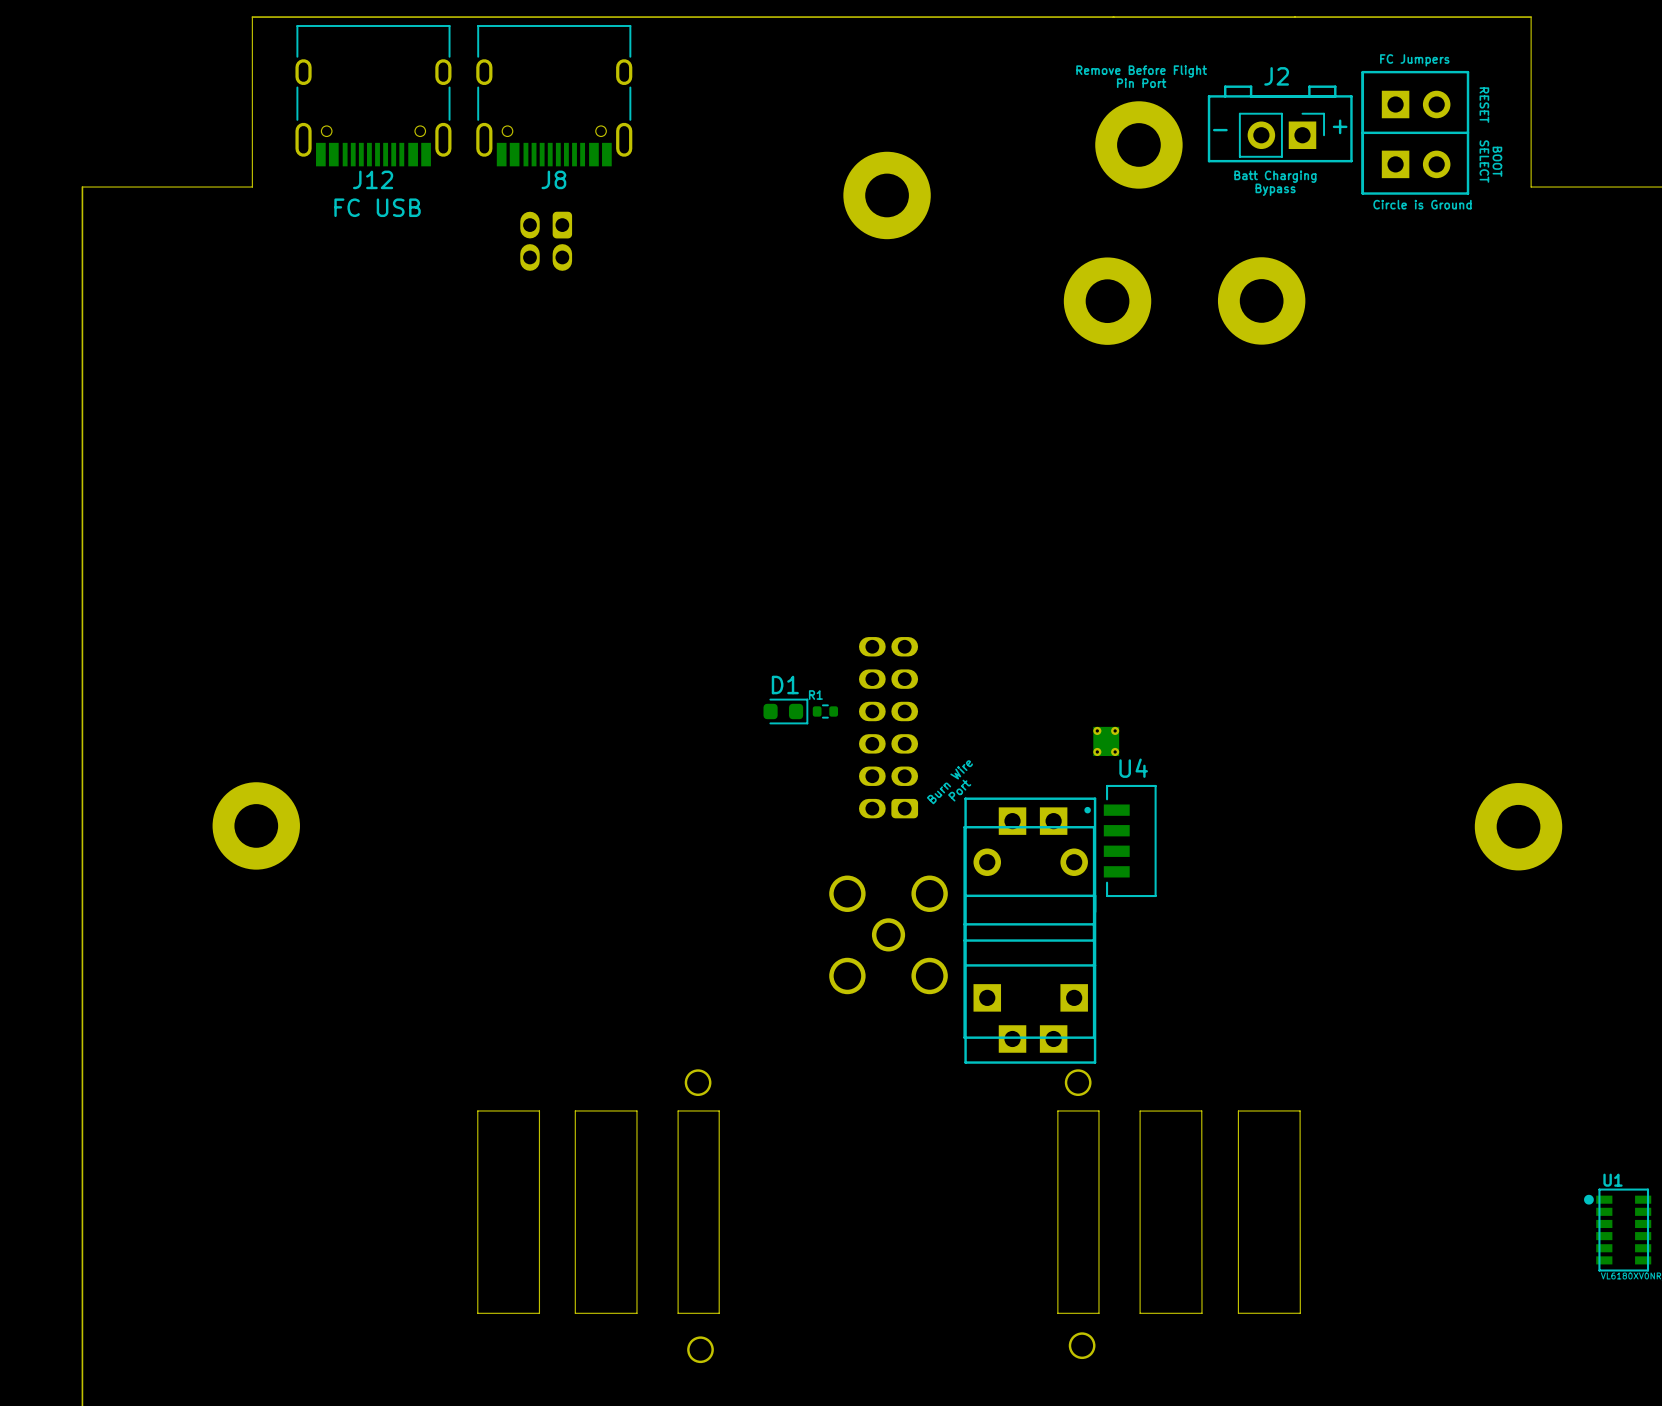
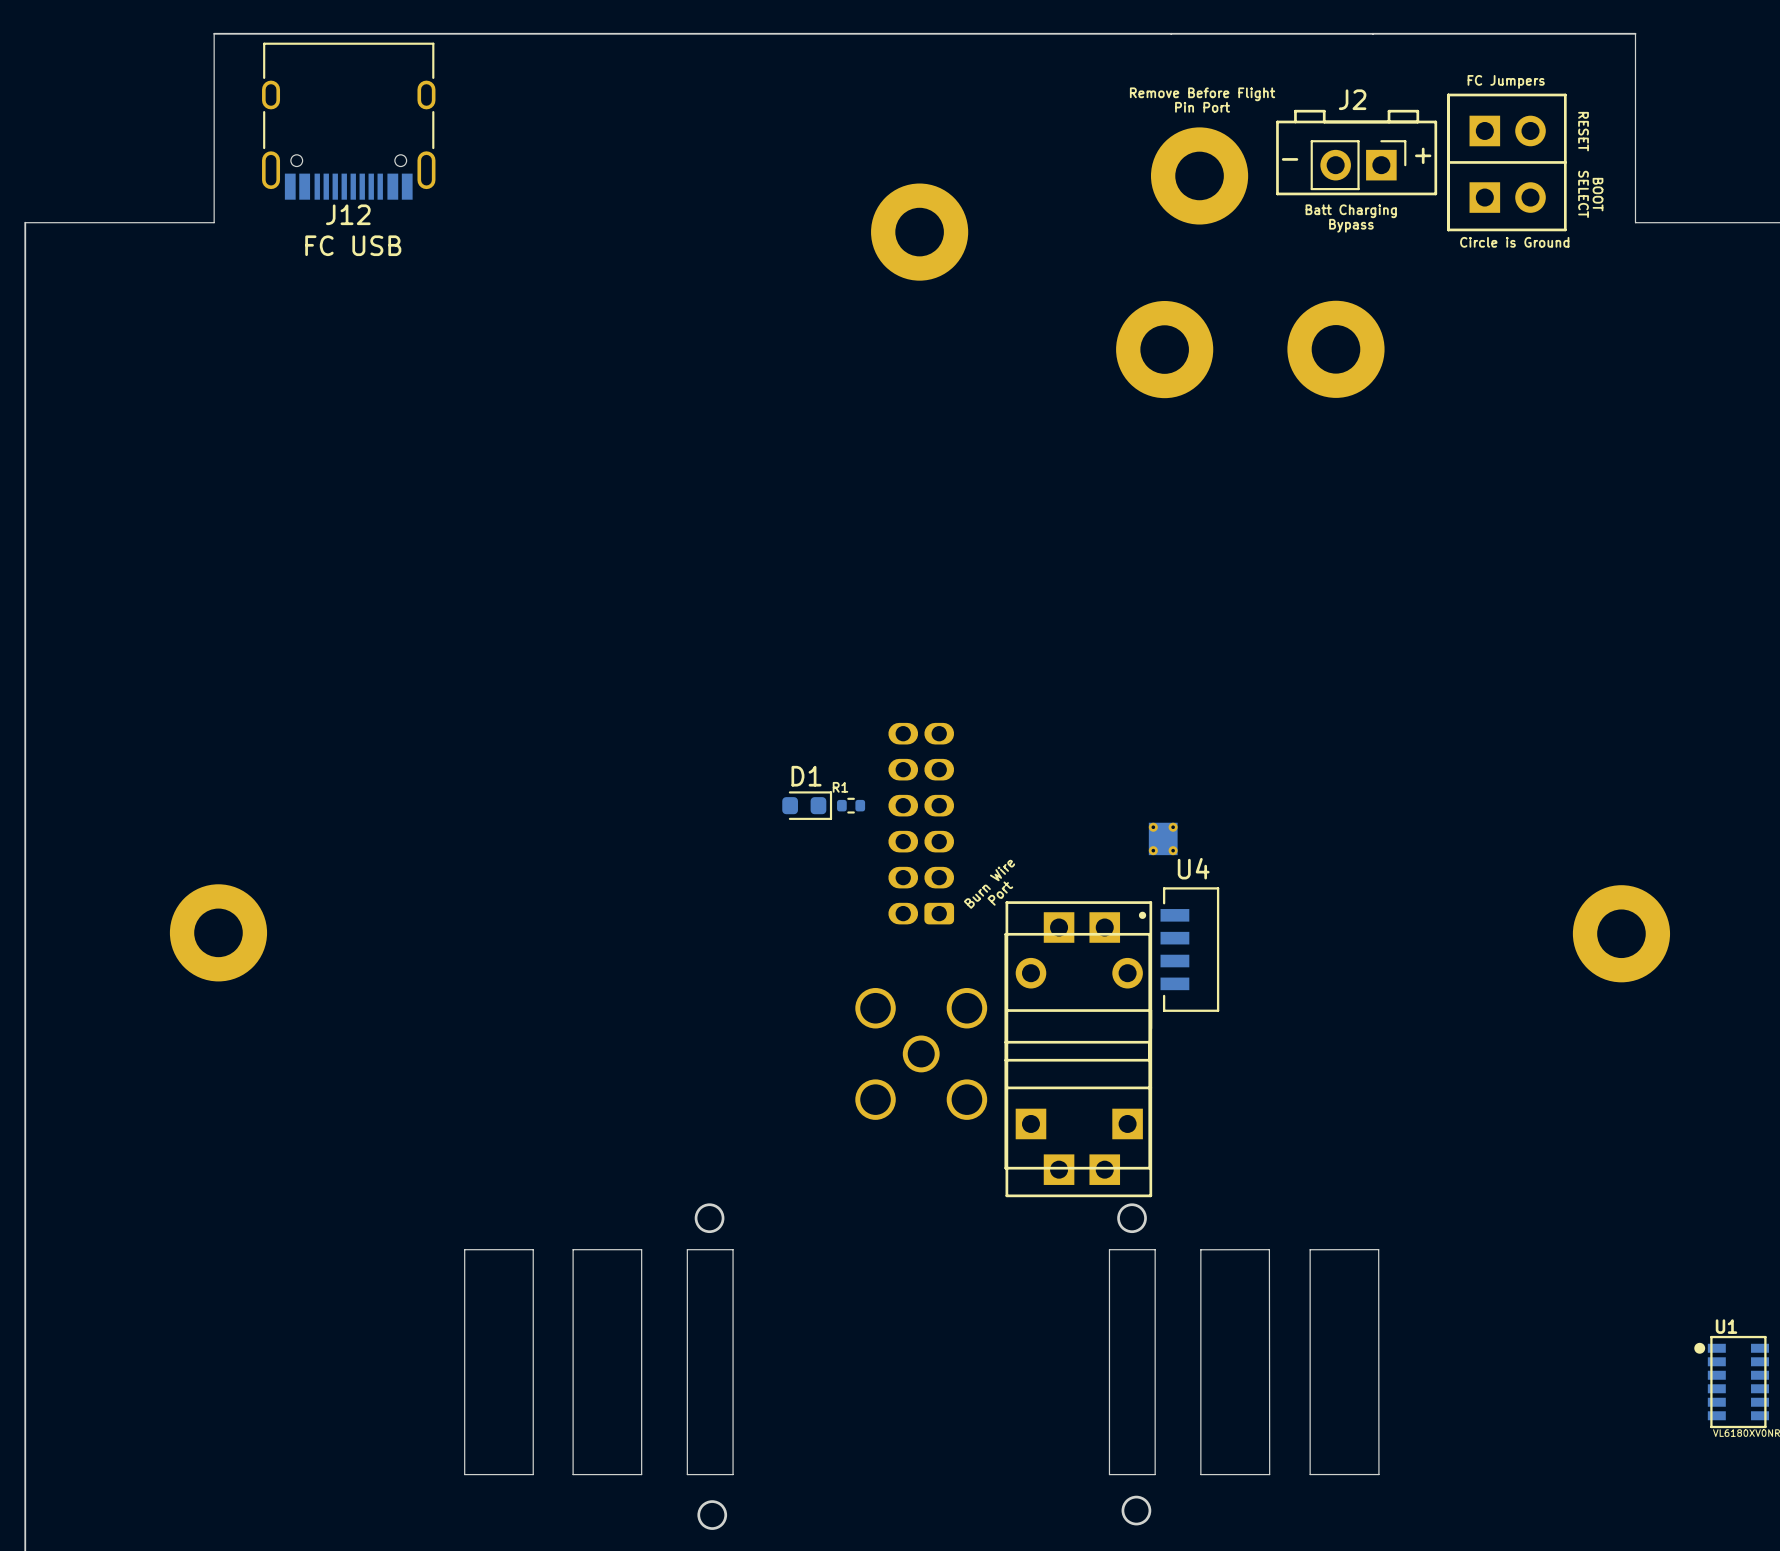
J8: (554, 95) -> none
part: (546, 241) -> none

